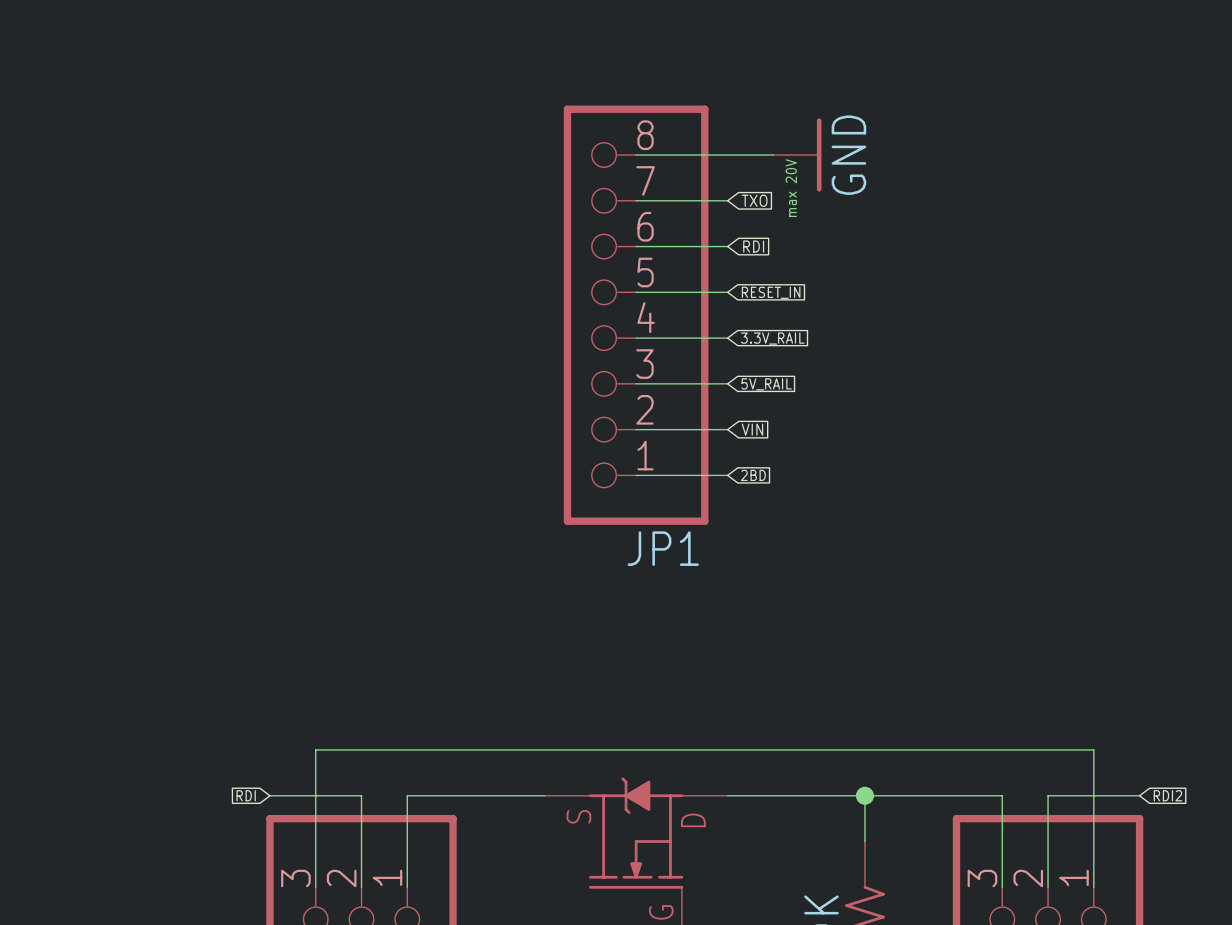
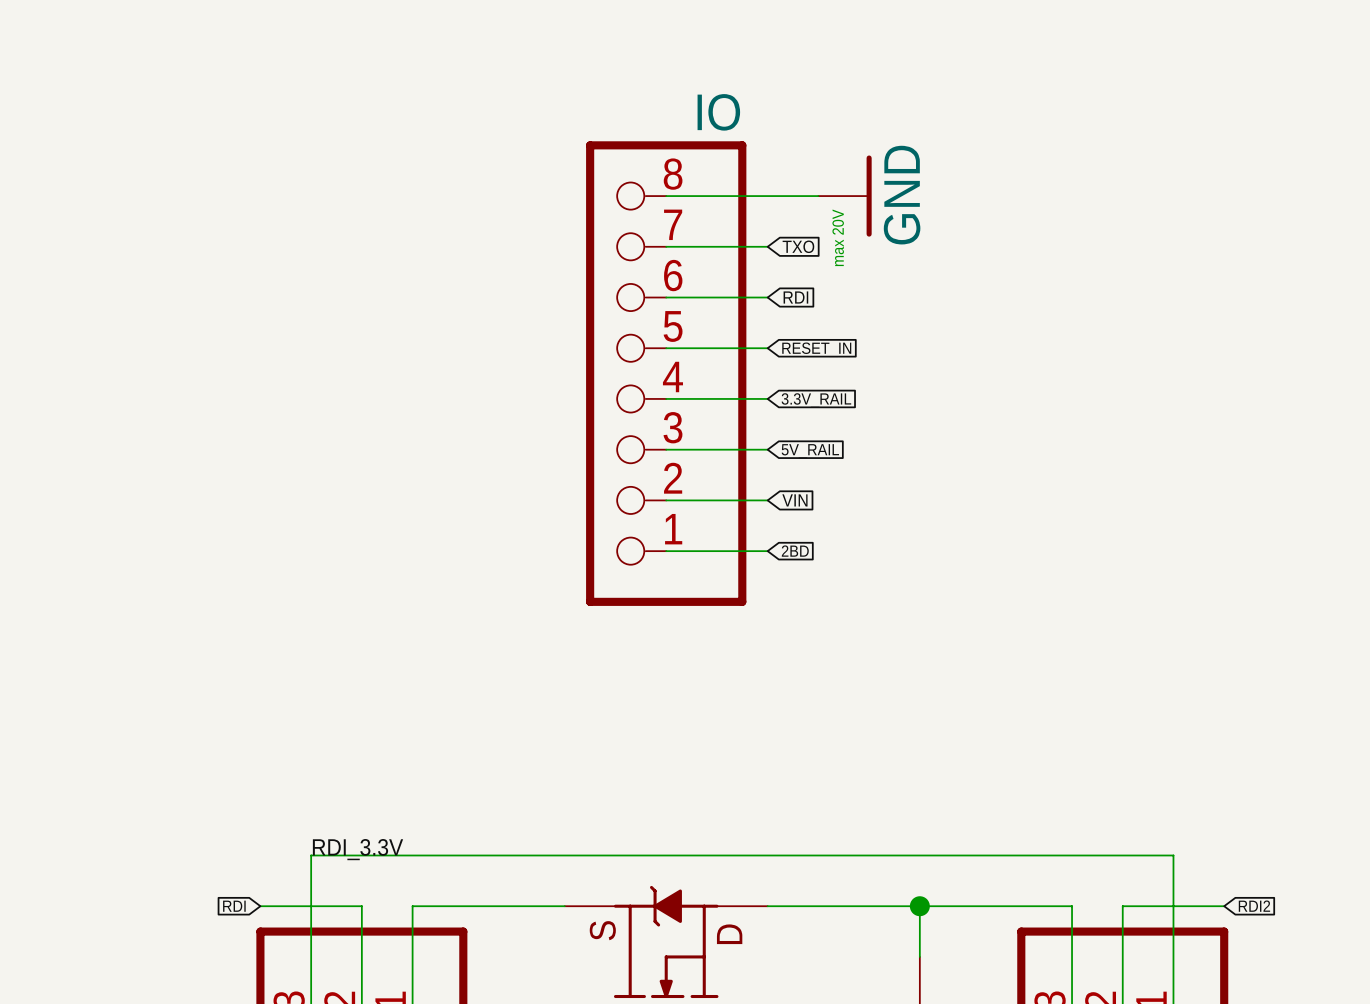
JP1 value: none -> IO (718, 112)
JP1 name: JP1 (663, 548) -> none
label: none -> RDI_3.3V (358, 849)

